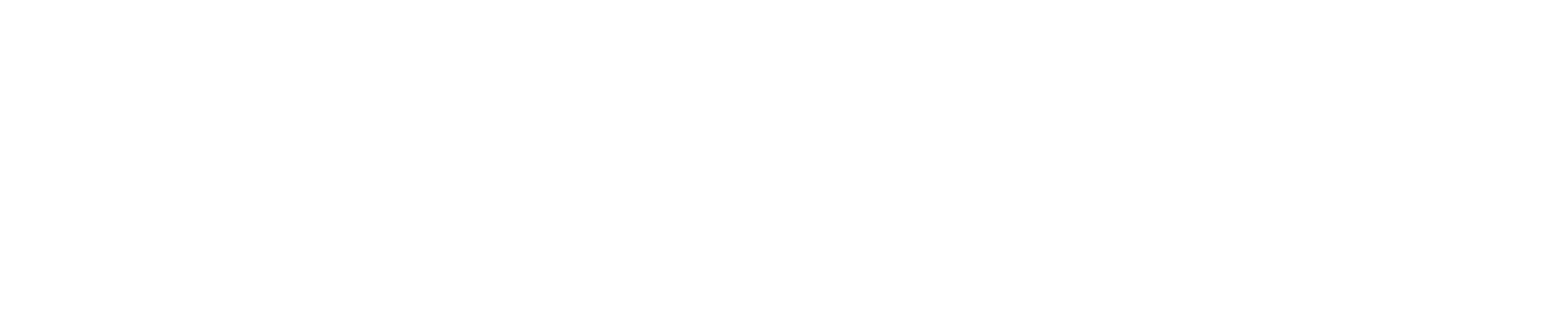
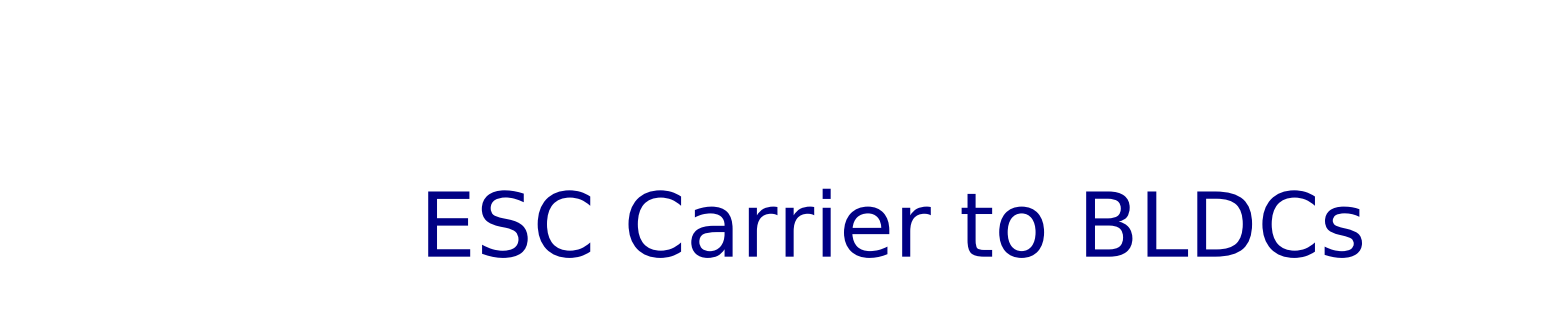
text: none -> ESC Carrier to BLDCs (895, 223)

